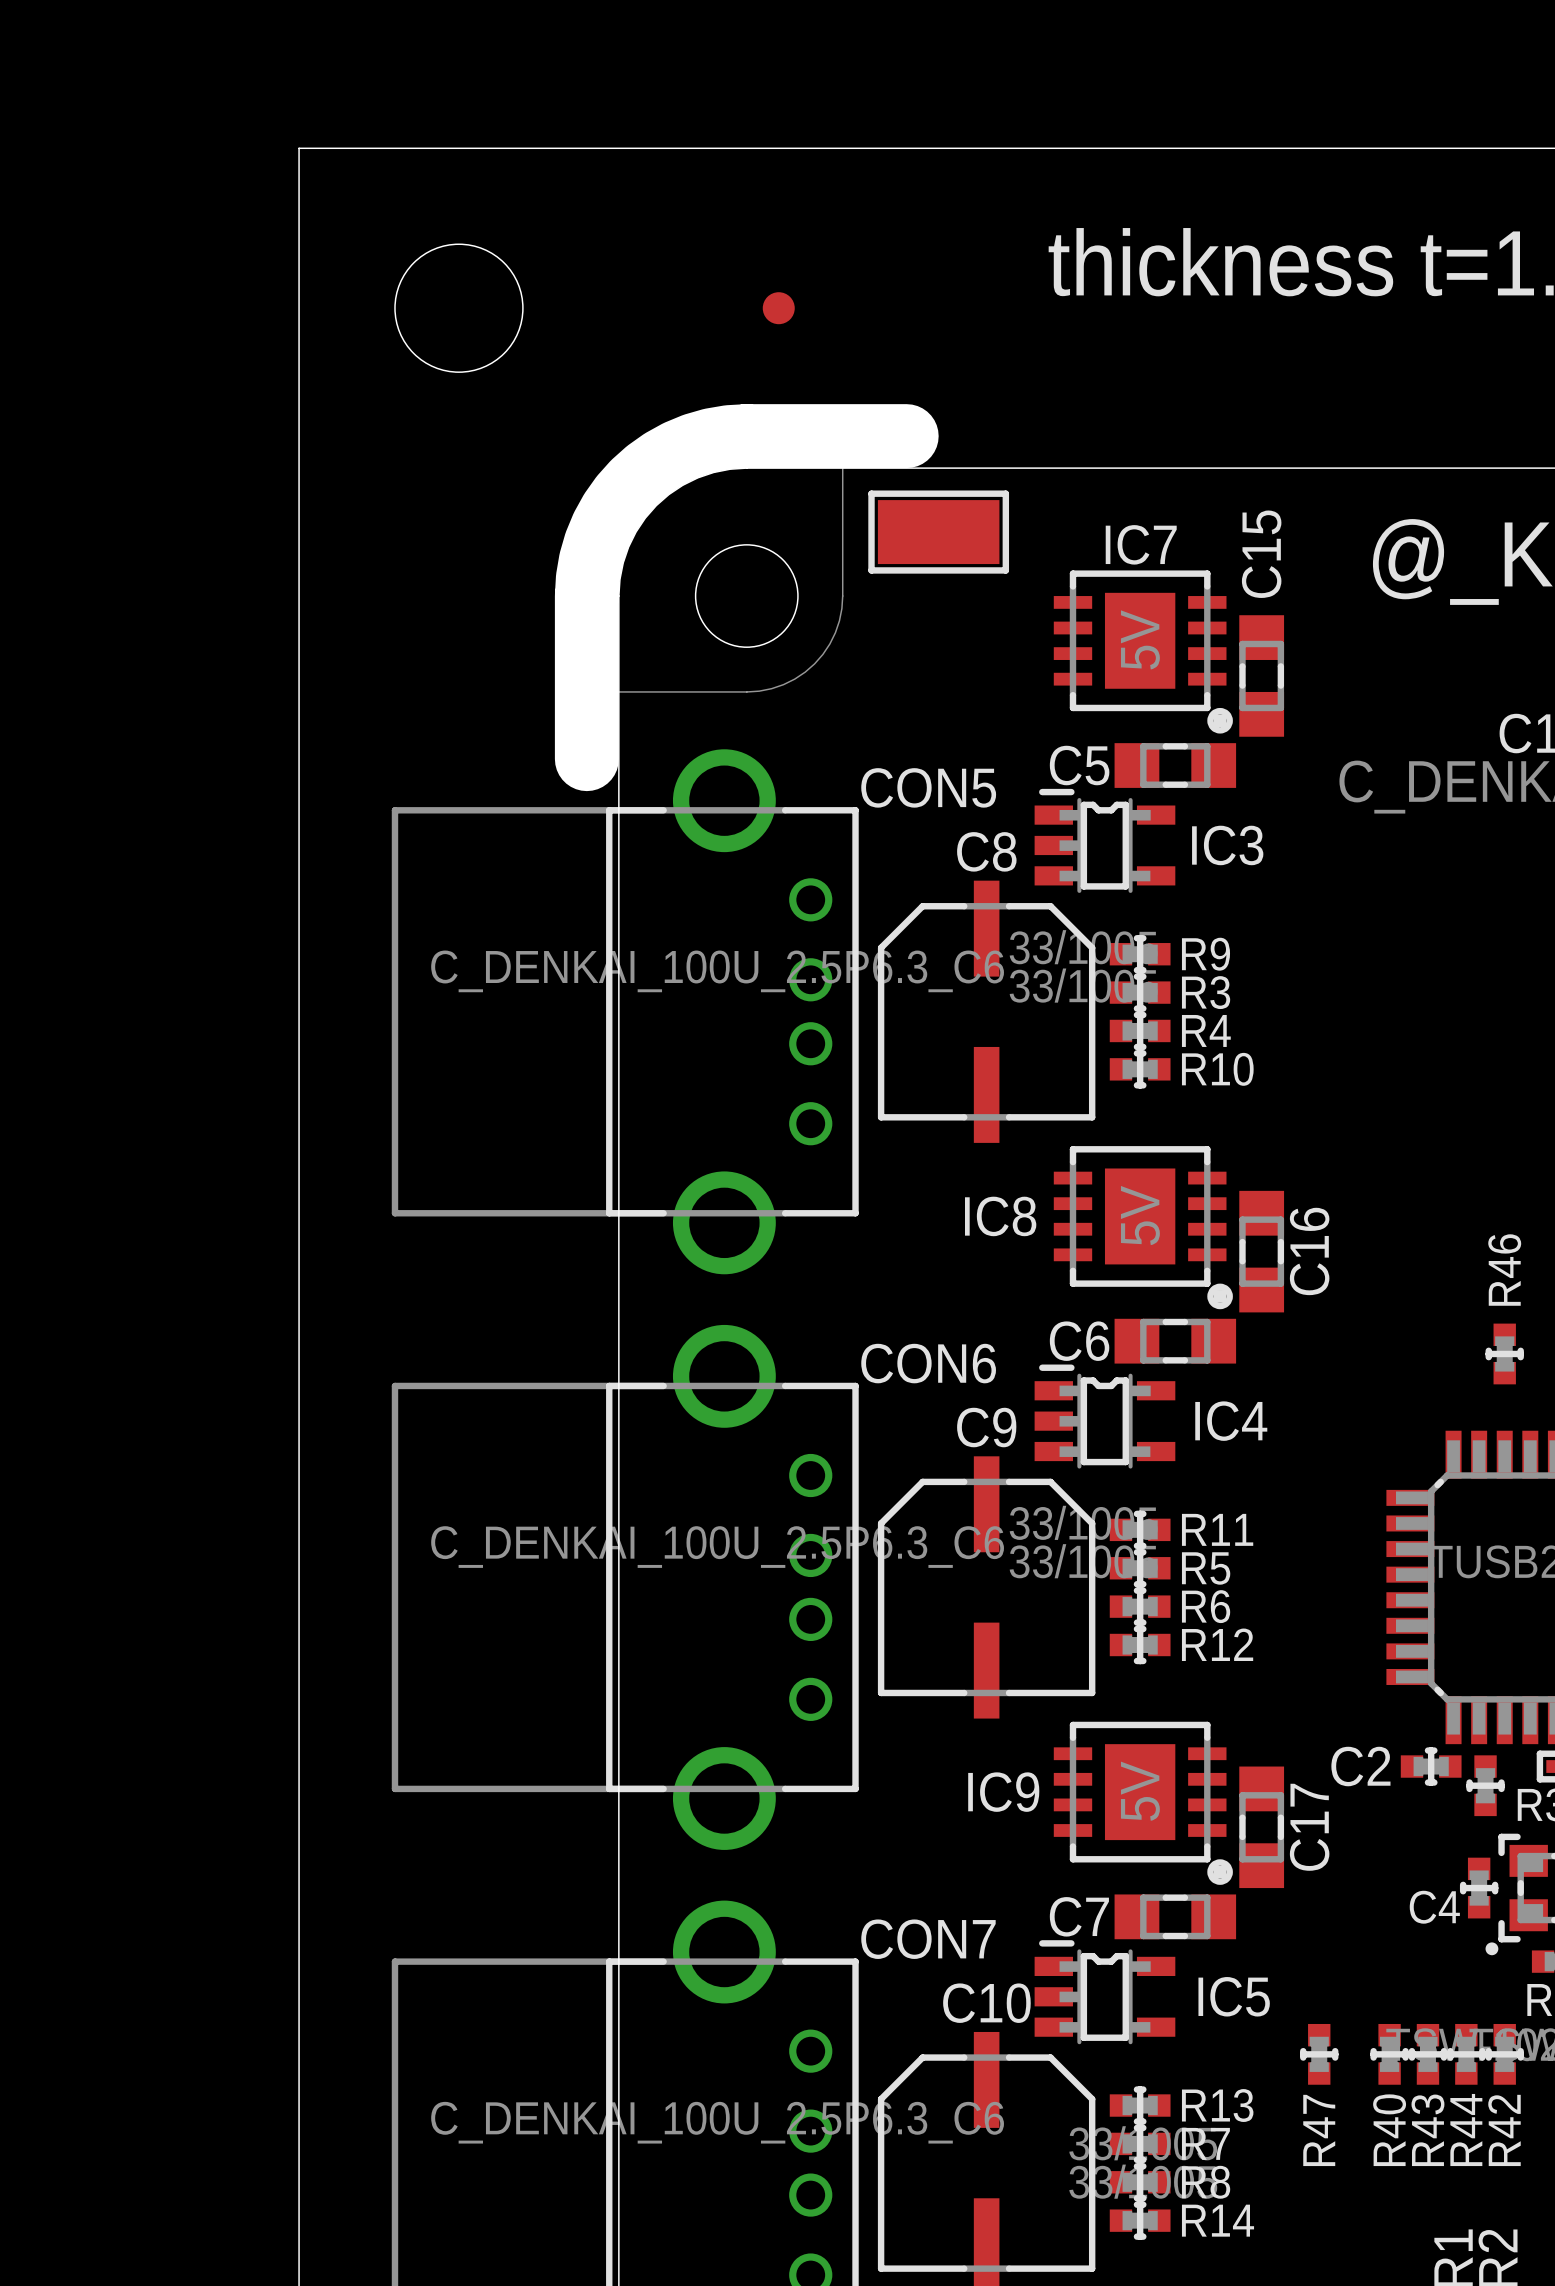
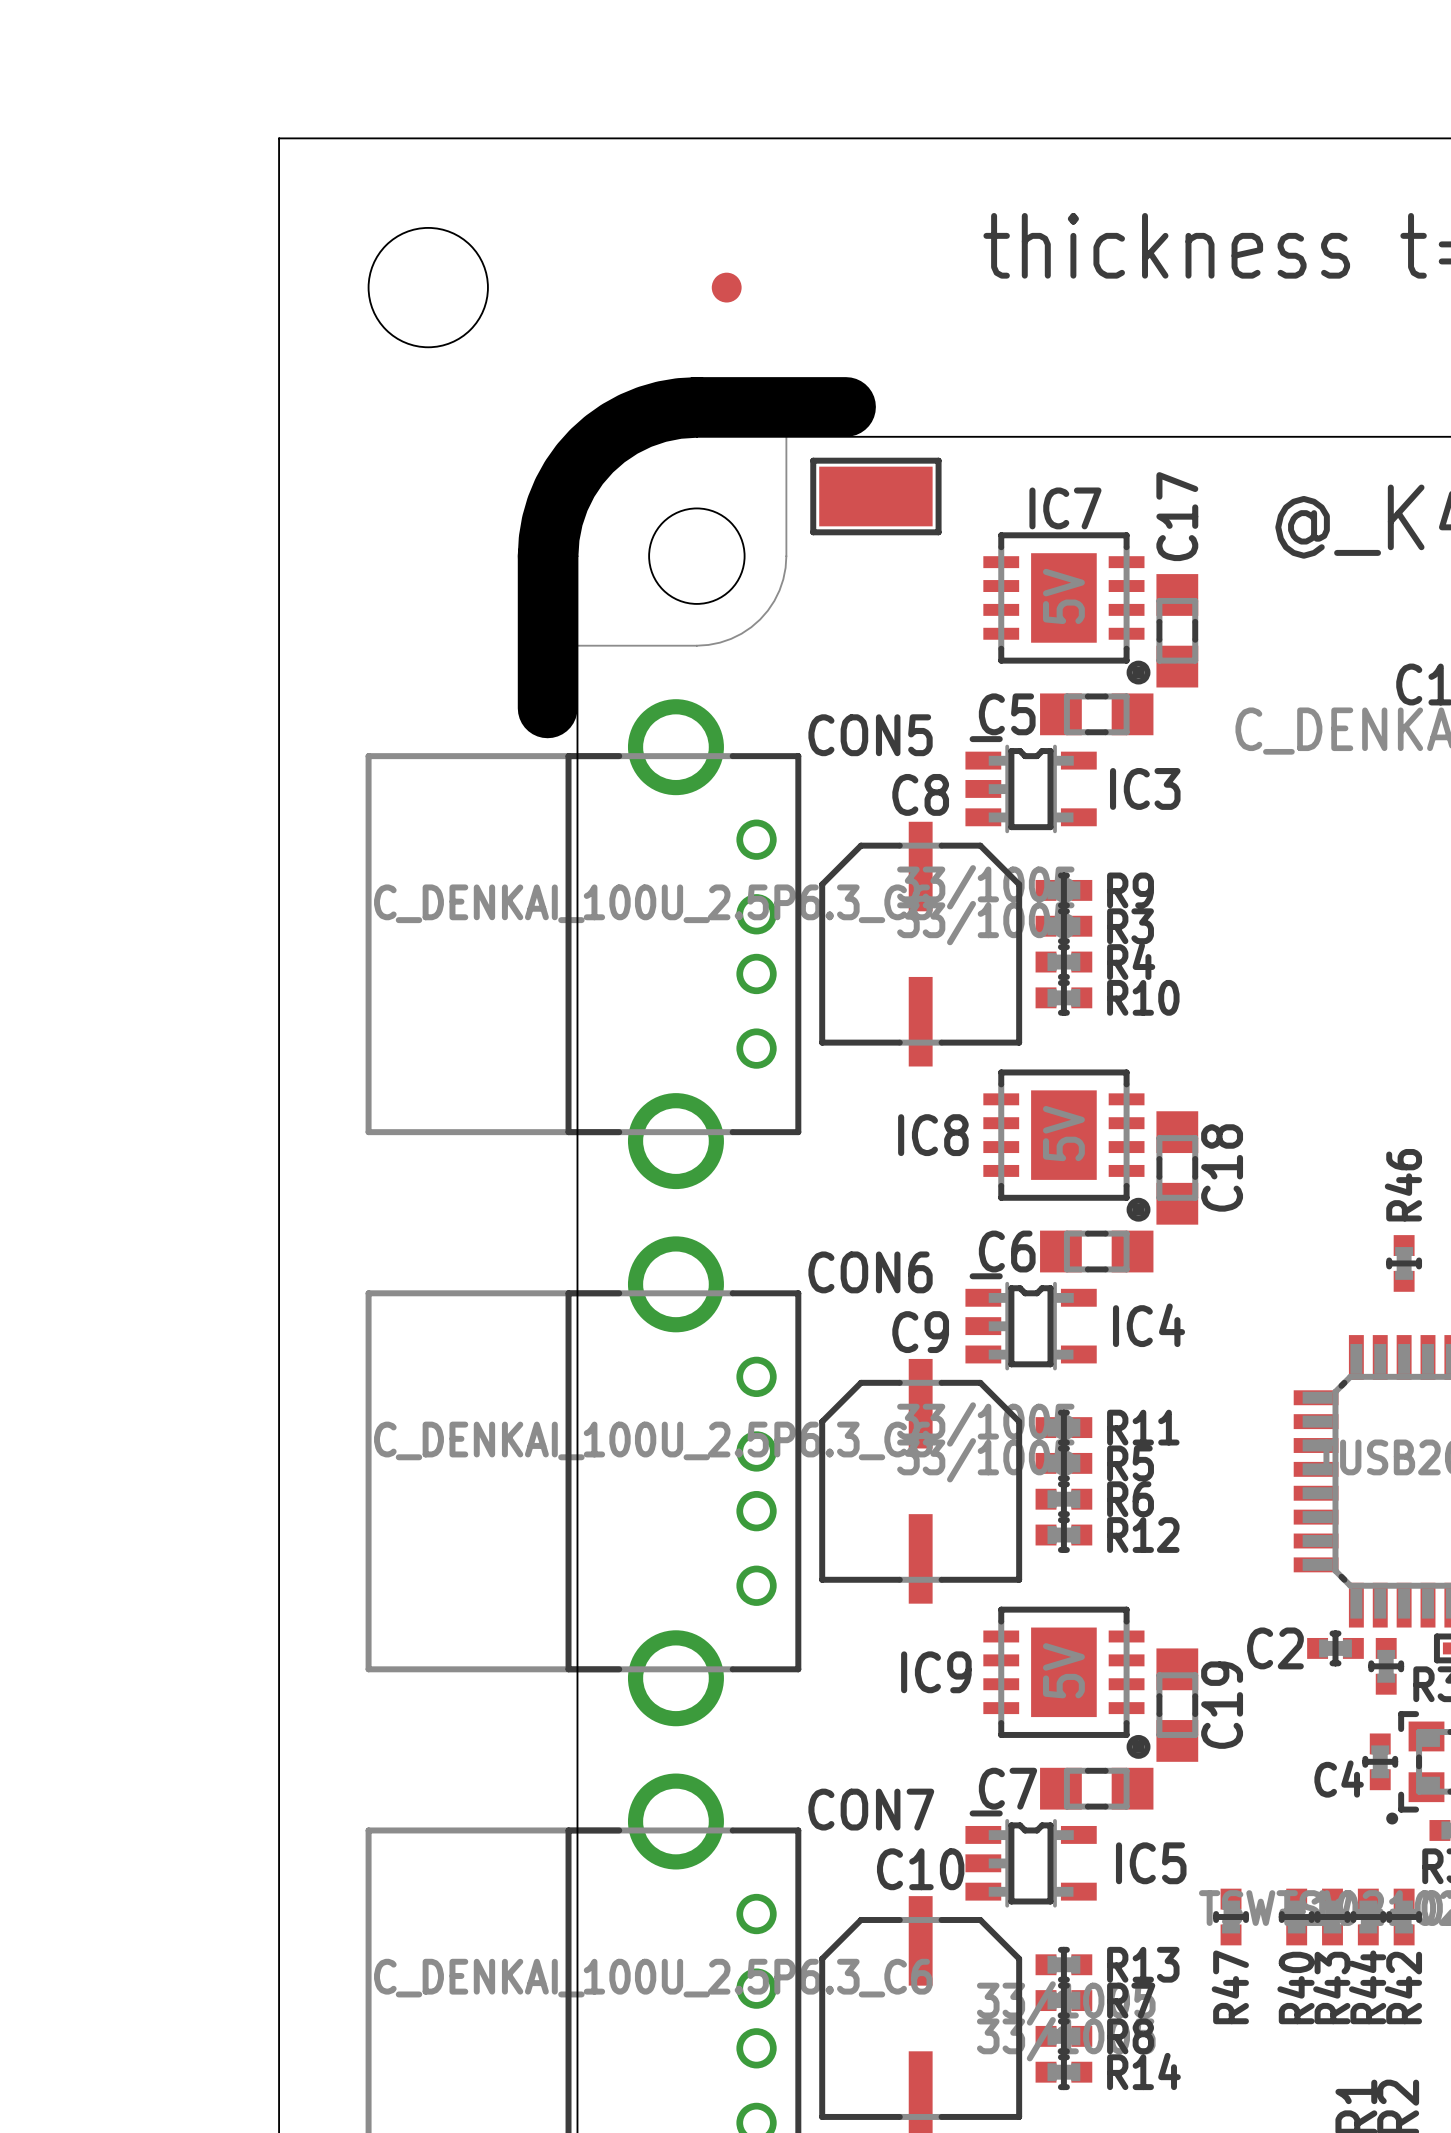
C15 name: C15 (1261, 554) -> C17 (1177, 516)
C16 name: C16 (1309, 1251) -> C18 (1222, 1167)
C17 name: C17 (1309, 1827) -> C19 (1222, 1705)

